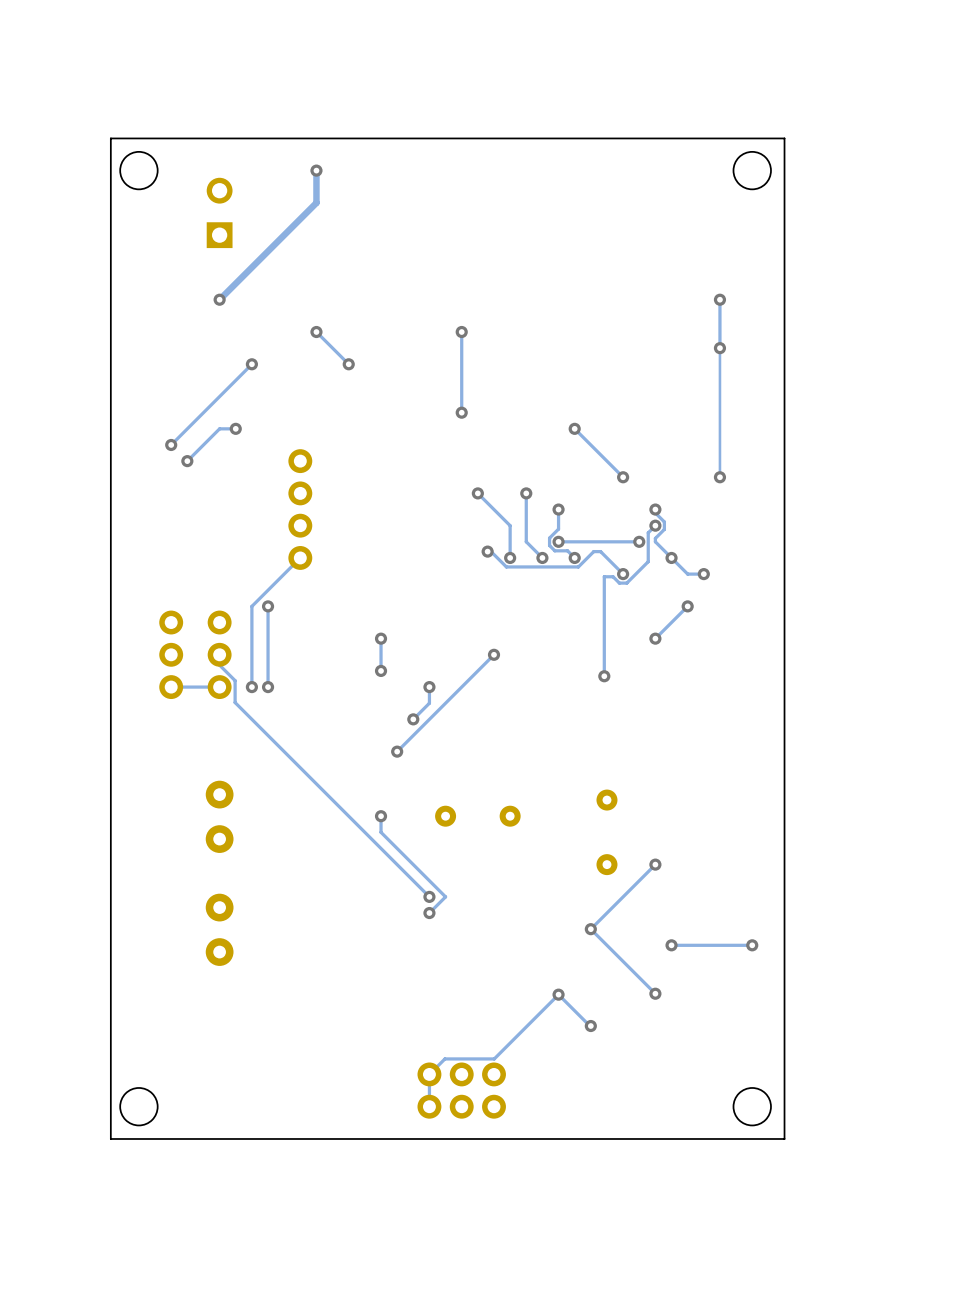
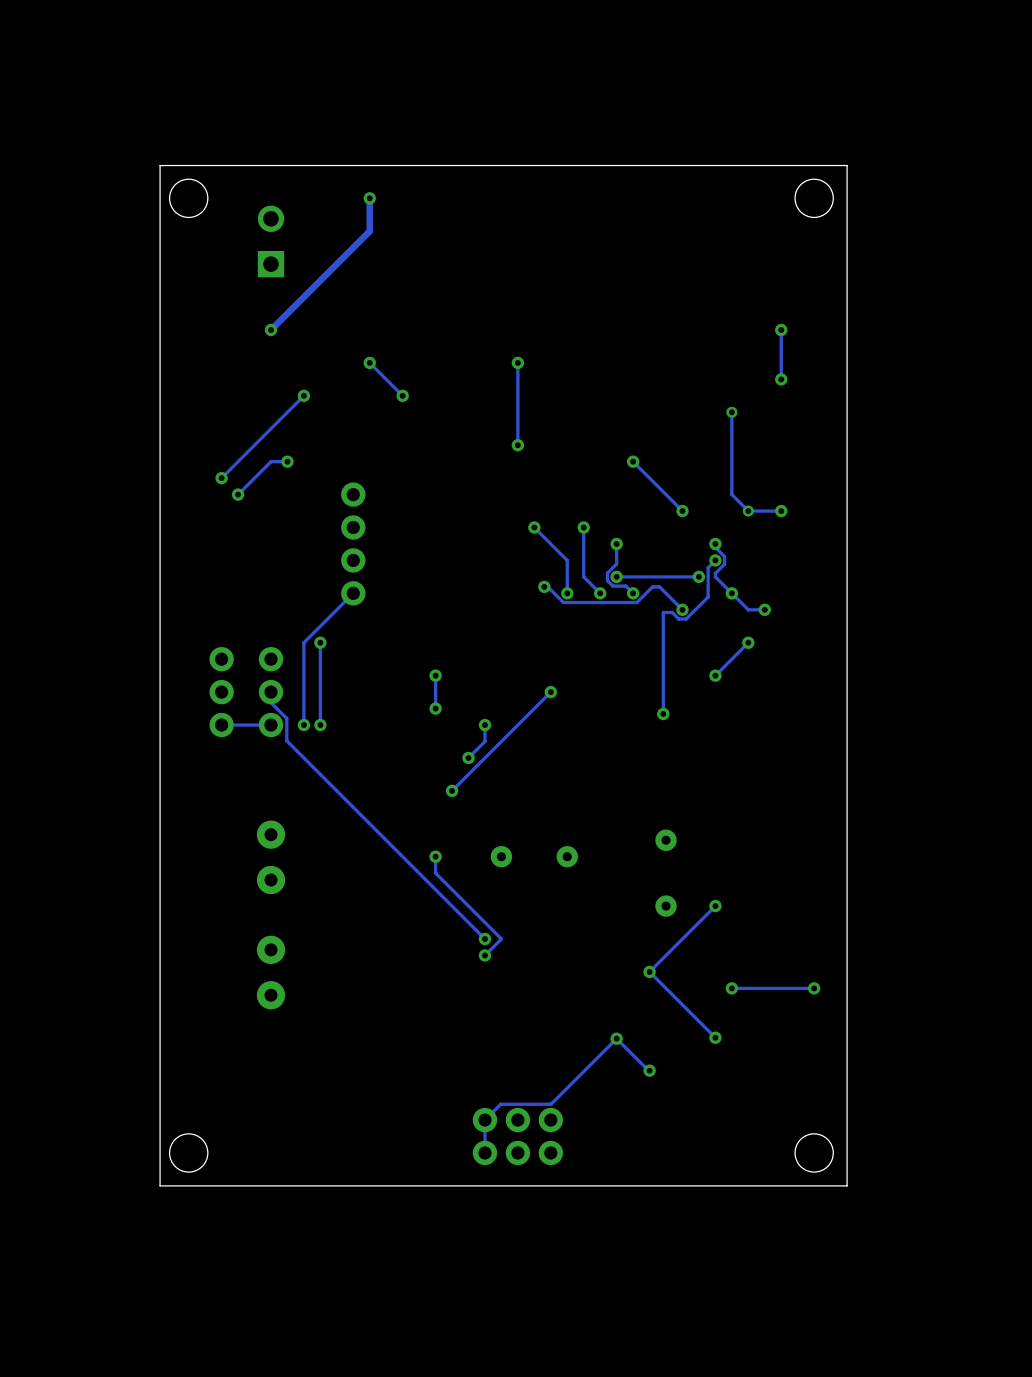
track: (719, 348) (719, 477) -> (731, 412) (731, 494) (748, 511) (781, 511)
via: none -> (731, 412)
via: none -> (748, 511)

